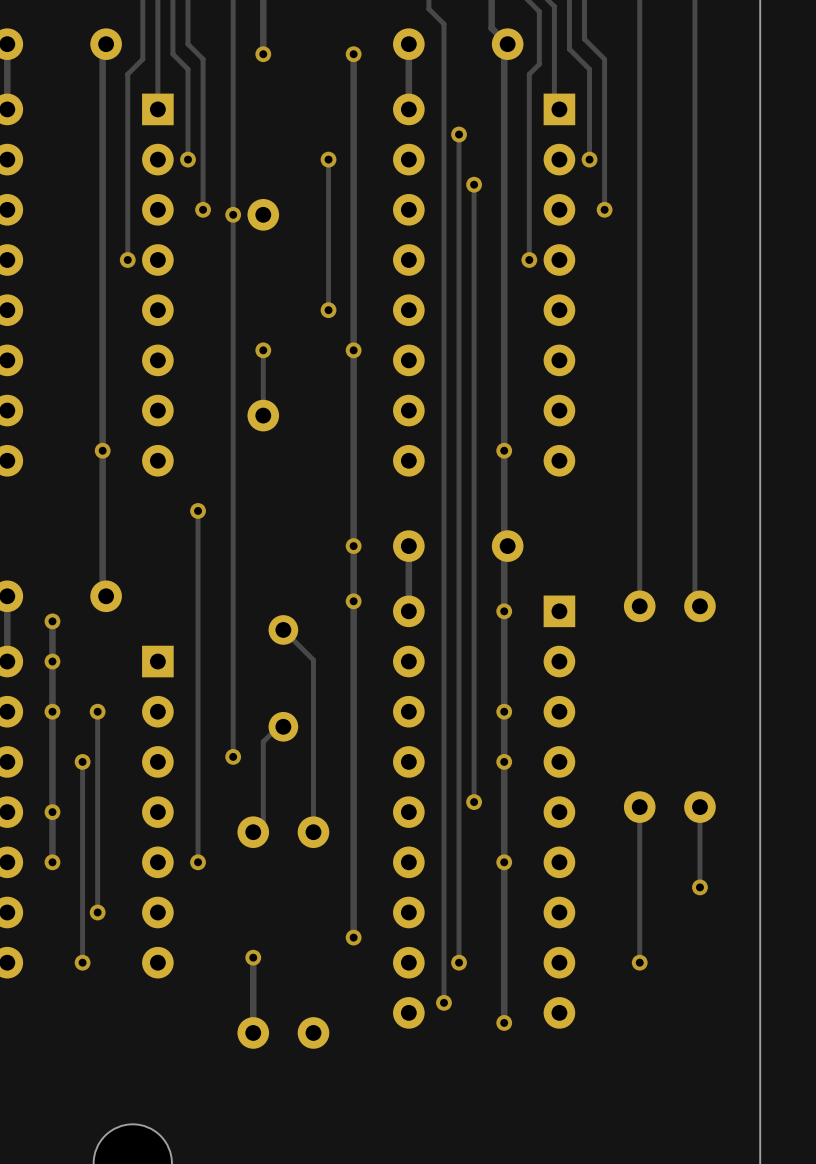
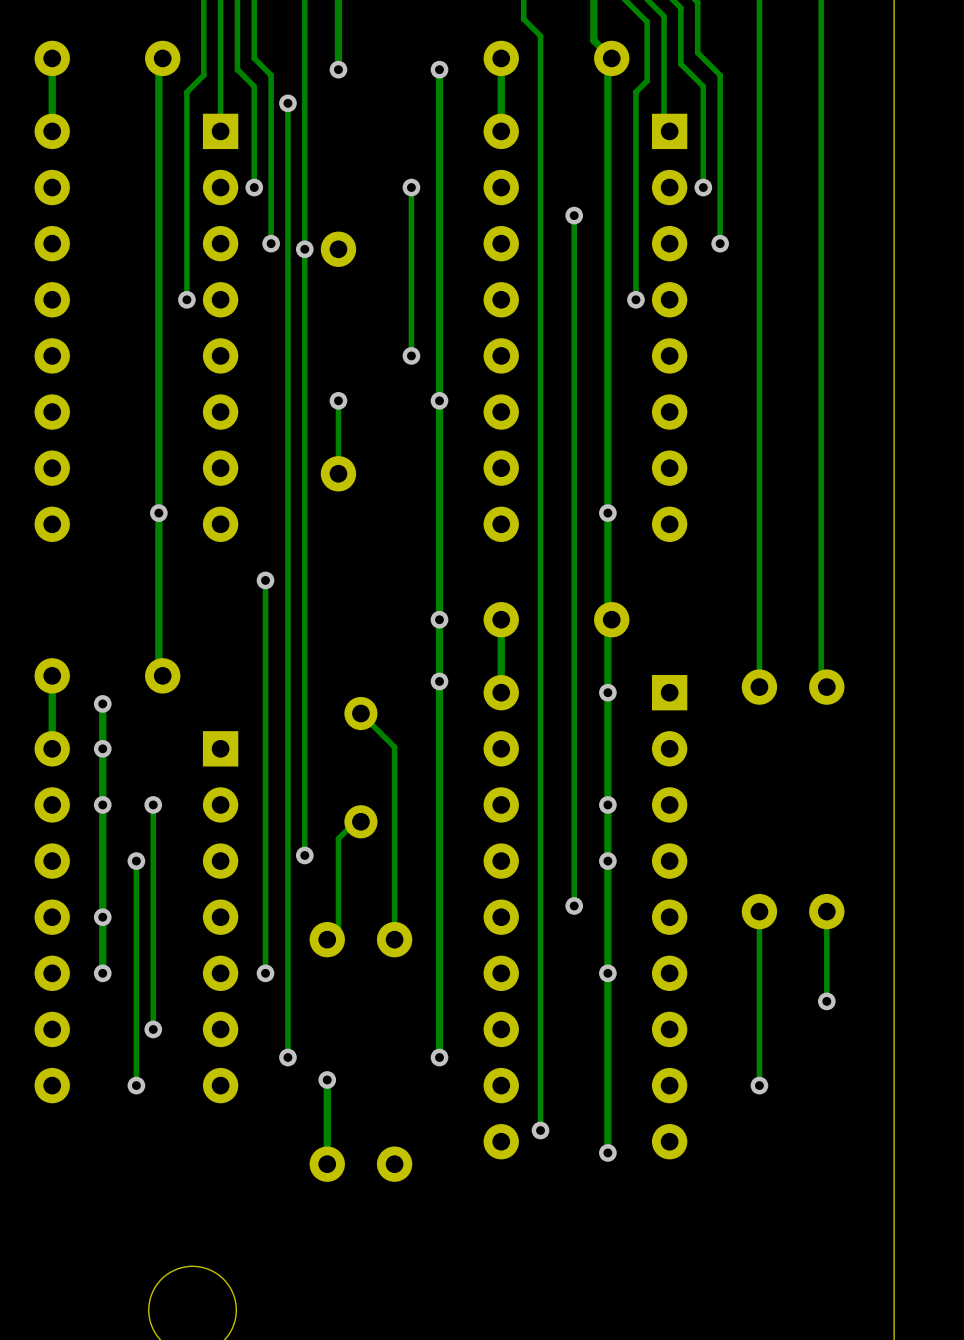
track: none -> (287, 103) (287, 1057)
via: none -> (287, 103)
track: (459, 134) (459, 962) -> none
via: (459, 134) -> none
via: none -> (287, 1057)
via: (459, 962) -> none

